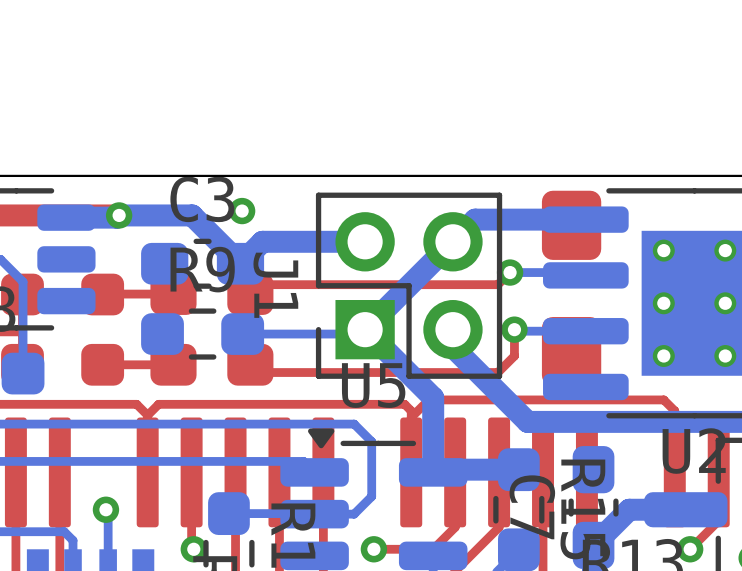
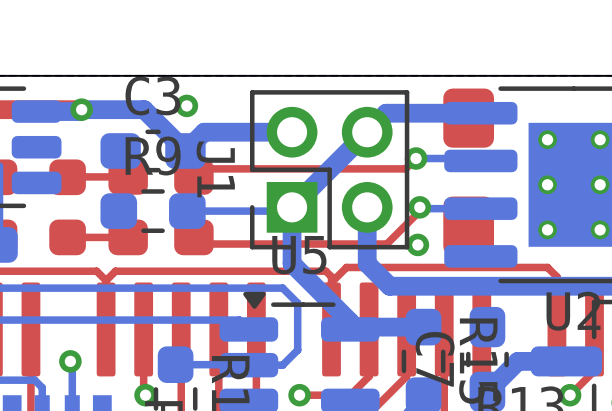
bottom track: (365, 329) (433, 397) (433, 463) -> (292, 207) (292, 263) (350, 321)
top track: (514, 334) (514, 356) (497, 372) (475, 372) -> (419, 211) (386, 244)
bottom track: (452, 347) (527, 421) -> (367, 222) (367, 263) (389, 286) (431, 286)
via: none -> (417, 244)

